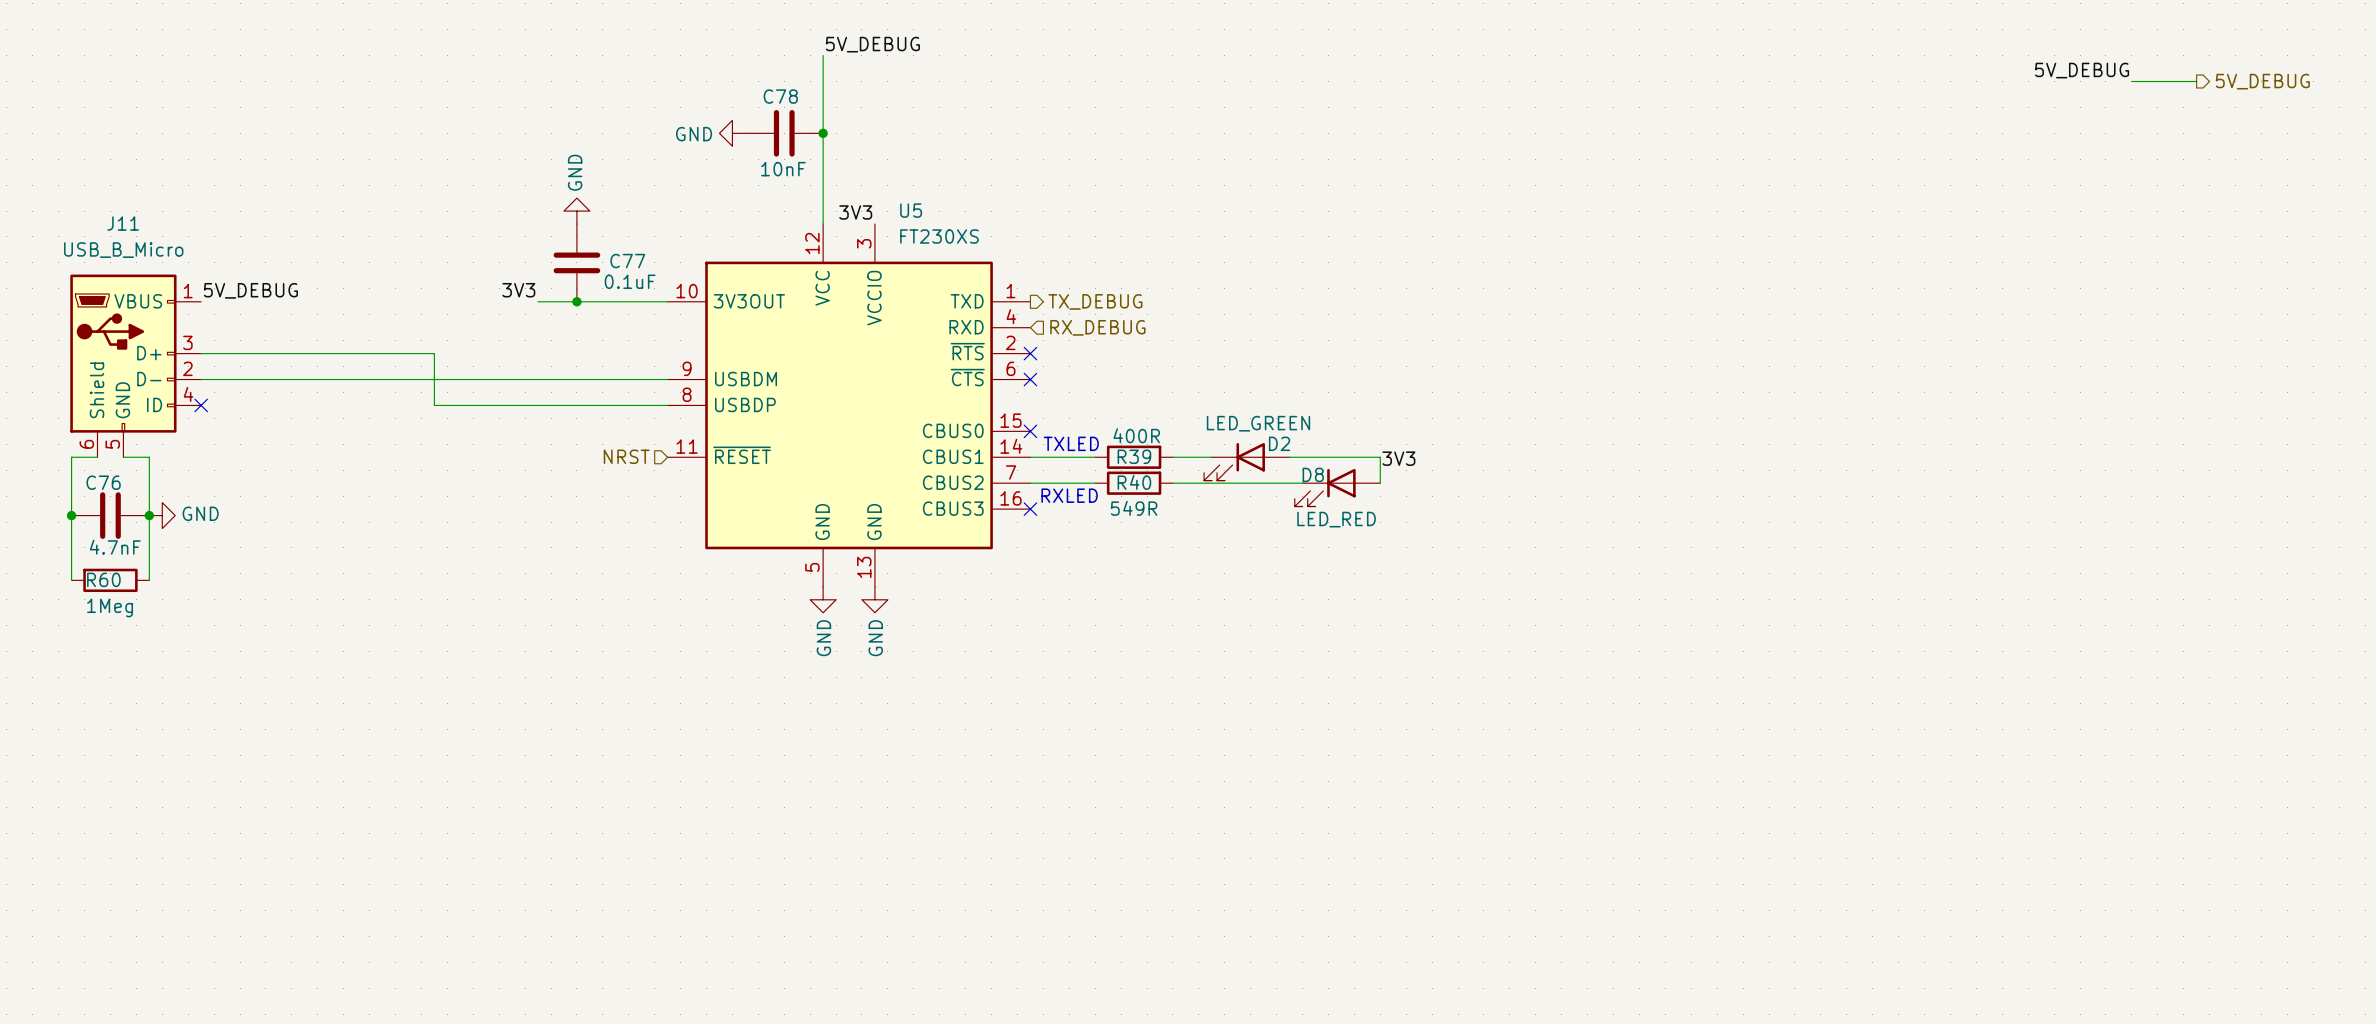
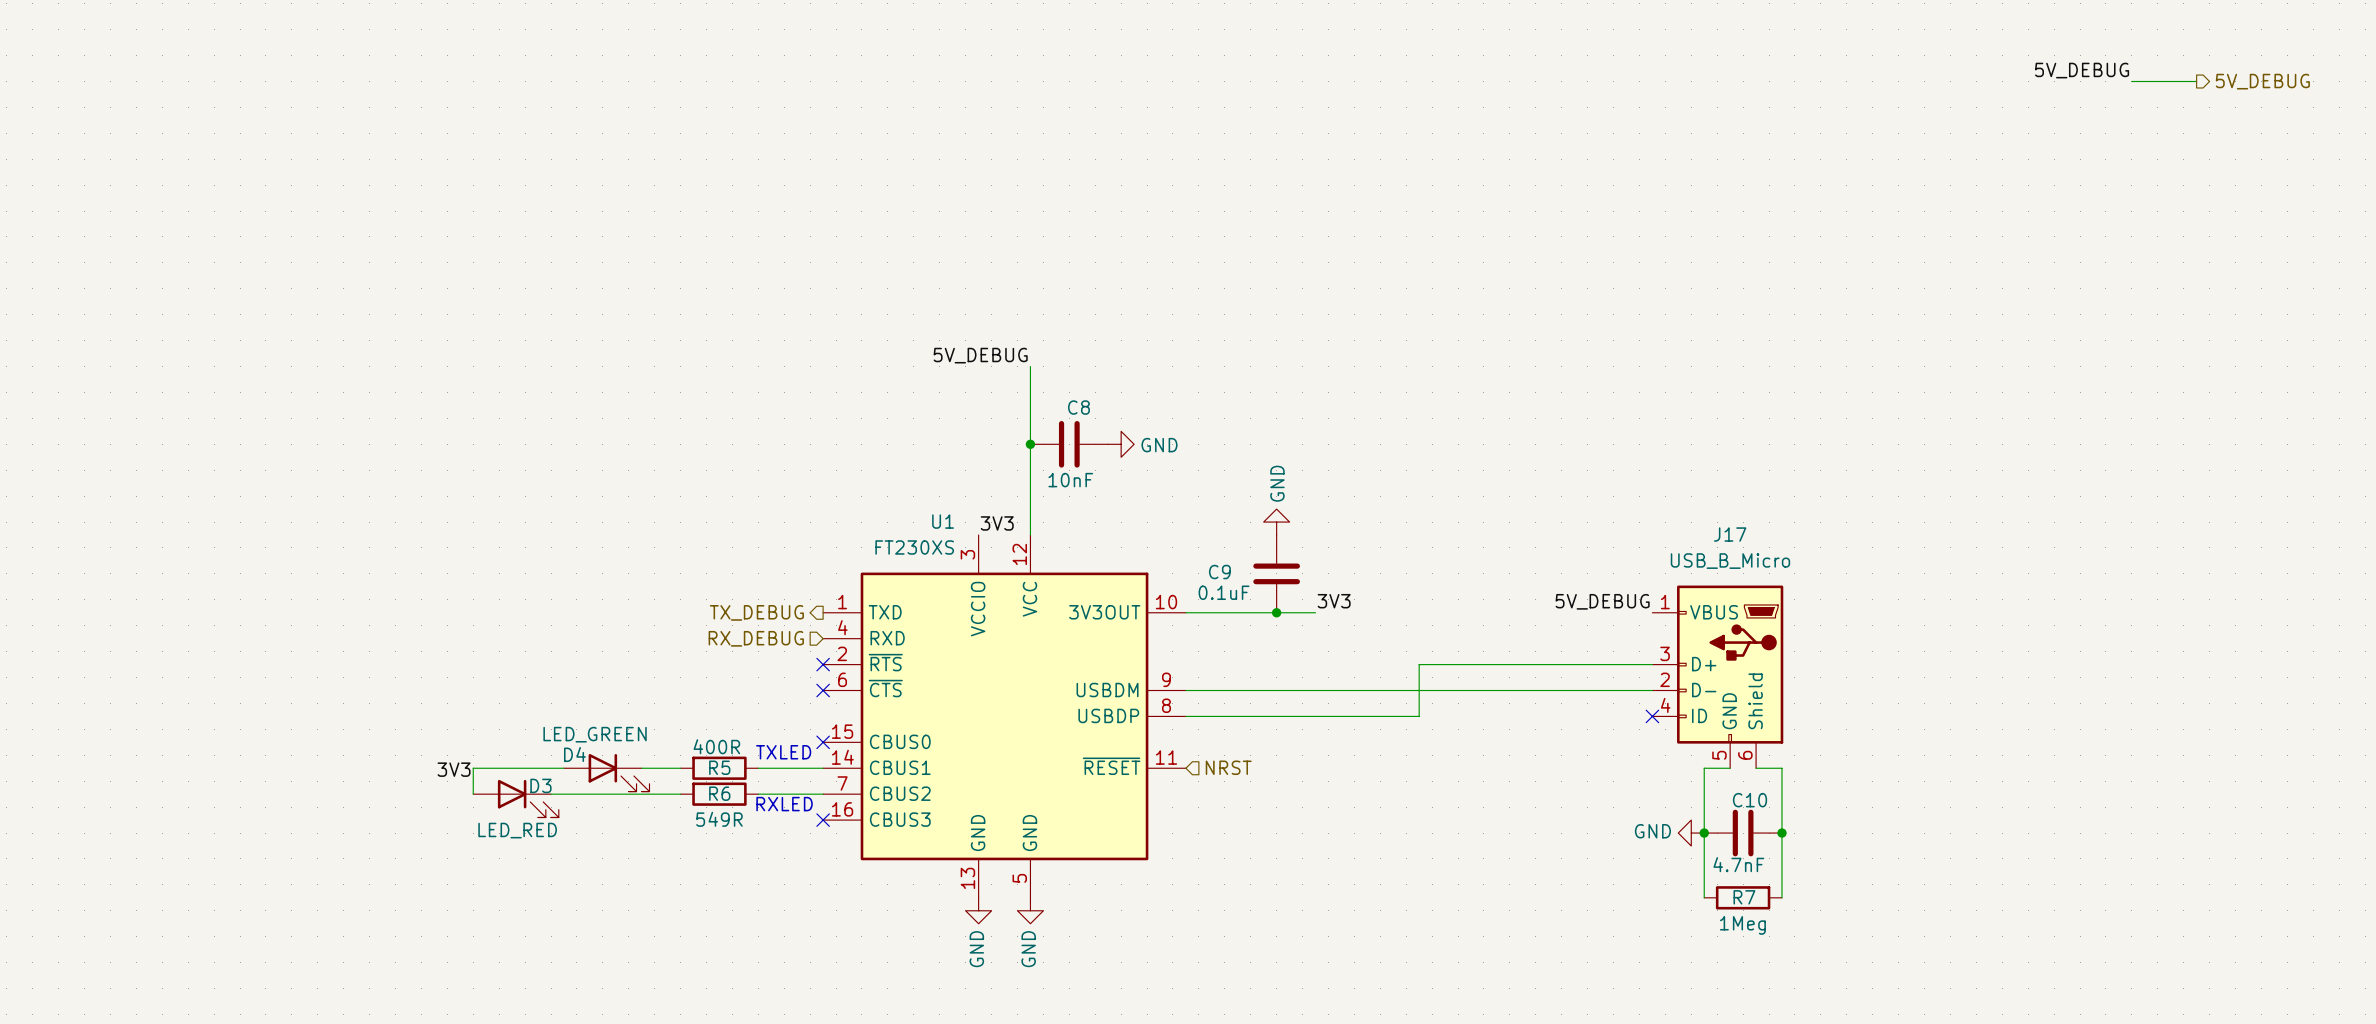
label: 5V_DEBUG (872, 44) -> none
wire: (823, 55) (823, 224) -> none
power symbol: GND (732, 133) -> none
C78: 10nF (784, 133) -> none
junction: (823, 133) -> none
power symbol: GND (576, 211) -> none
label: 3V3 (855, 212) -> none
C77: 0.1uF (576, 262) -> none
label: 5V_DEBUG (250, 290) -> none
label: 3V3 (518, 290) -> none
wire: (538, 301) (667, 301) -> none
junction: (576, 301) -> none
hierarchical label: TX_DEBUG (1095, 301) -> none
hierarchical label: RX_DEBUG (1097, 327) -> none
wire: (201, 353) (434, 353) (434, 405) (667, 405) -> none
no-connect mark: (1030, 353) -> none
label: none -> 5V_DEBUG (980, 355)
J11: USB_B_Micro (135, 365) -> none
wire: none -> (1030, 366) (1030, 535)
wire: (201, 379) (667, 379) -> none
no-connect mark: (1030, 379) -> none
no-connect mark: (201, 405) -> none
U5: FT230XS (849, 405) -> none
no-connect mark: (1030, 431) -> none
text: TXLED (1071, 443) -> none
junction: none -> (1030, 444)
C8: none -> 10nF (1069, 444)
power symbol: none -> GND (1121, 444)
hierarchical label: NRST (626, 456) -> none
wire: (97, 457) (71, 457) (71, 580) -> none
wire: (123, 457) (149, 457) (149, 580) -> none
wire: (1030, 457) (1095, 457) -> none
R39: 400R (1134, 457) -> none
wire: (1172, 457) (1211, 457) -> none
wire: (1289, 457) (1380, 457) (1380, 483) -> none
label position: 3V3 (1398, 458) -> 3V3 (1334, 601)
D2: LED_GREEN (1246, 461) -> none
wire: (1030, 483) (1095, 483) -> none
R40: 549R (1134, 483) -> none
wire: (1172, 483) (1302, 483) -> (1185, 612) (1315, 612)
D8: LED_RED (1337, 487) -> none
text: RXLED (1069, 495) -> none
no-connect mark: (1030, 509) -> none
junction: (71, 515) -> none
C76: 4.7nF (110, 515) -> none
junction: (149, 515) -> none
power symbol: GND (162, 515) -> none
power symbol: none -> GND (1276, 522)
label: none -> 3V3 (997, 523)
C9: none -> 0.1uF (1276, 573)
R60: 1Meg (110, 580) -> none
power symbol: GND (823, 599) -> none
power symbol: GND (874, 599) -> none
label: none -> 5V_DEBUG (1602, 601)
hierarchical label: none -> TX_DEBUG (756, 612)
junction: none -> (1276, 612)
hierarchical label: none -> RX_DEBUG (756, 638)
no-connect mark: none -> (823, 664)
wire: none -> (1652, 664) (1419, 664) (1419, 716) (1185, 716)
J17: none -> USB_B_Micro (1717, 676)
no-connect mark: none -> (823, 690)
wire: none -> (1185, 690) (1652, 690)
U1: none -> FT230XS (1004, 716)
no-connect mark: none -> (1652, 716)
no-connect mark: none -> (823, 742)
text: none -> TXLED (783, 752)
hierarchical label: none -> NRST (1228, 767)
wire: none -> (563, 768) (473, 768) (473, 794)
wire: none -> (641, 768) (680, 768)
R5: none -> 400R (719, 768)
wire: none -> (758, 768) (823, 768)
wire: none -> (1730, 768) (1704, 768) (1704, 897)
wire: none -> (1756, 768) (1781, 768) (1781, 897)
label: none -> 3V3 (454, 769)
D4: none -> LED_GREEN (606, 772)
wire: none -> (551, 794) (680, 794)
R6: none -> 549R (719, 794)
wire: none -> (758, 794) (823, 794)
D3: none -> LED_RED (516, 798)
text: none -> RXLED (784, 804)
no-connect mark: none -> (823, 820)
power symbol: none -> GND (1691, 833)
junction: none -> (1704, 833)
C10: none -> 4.7nF (1743, 833)
junction: none -> (1781, 833)
R7: none -> 1Meg (1743, 897)
power symbol: none -> GND (978, 910)
power symbol: none -> GND (1030, 910)

